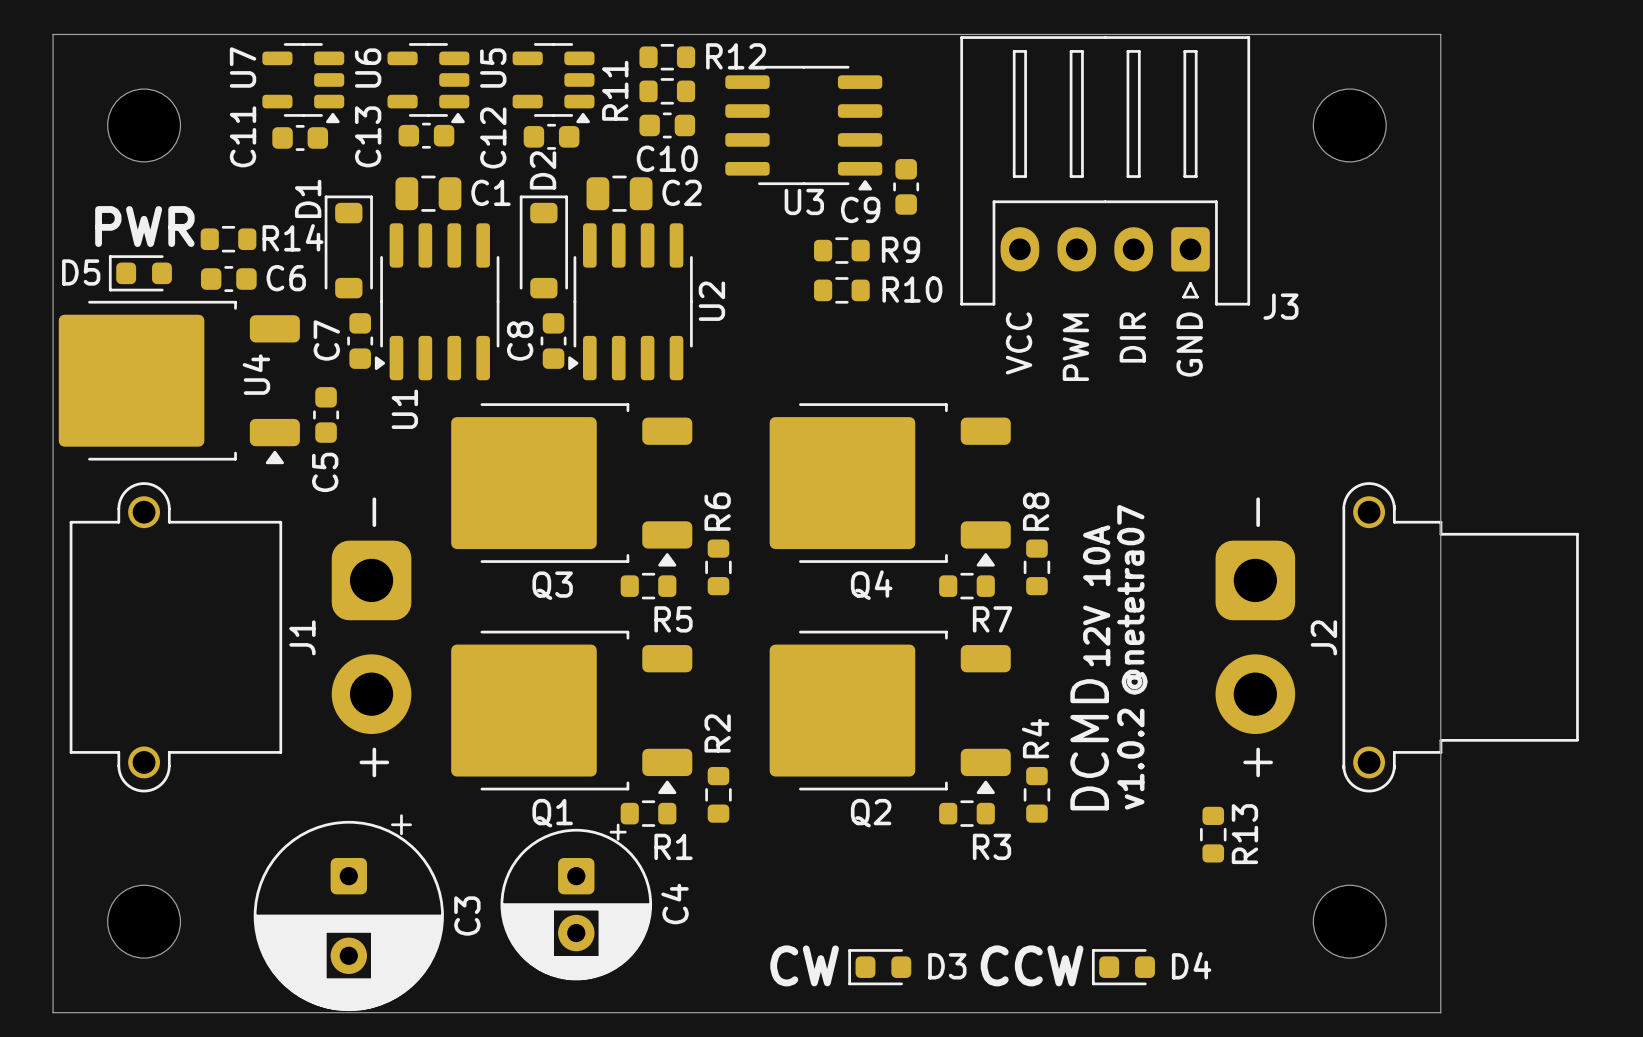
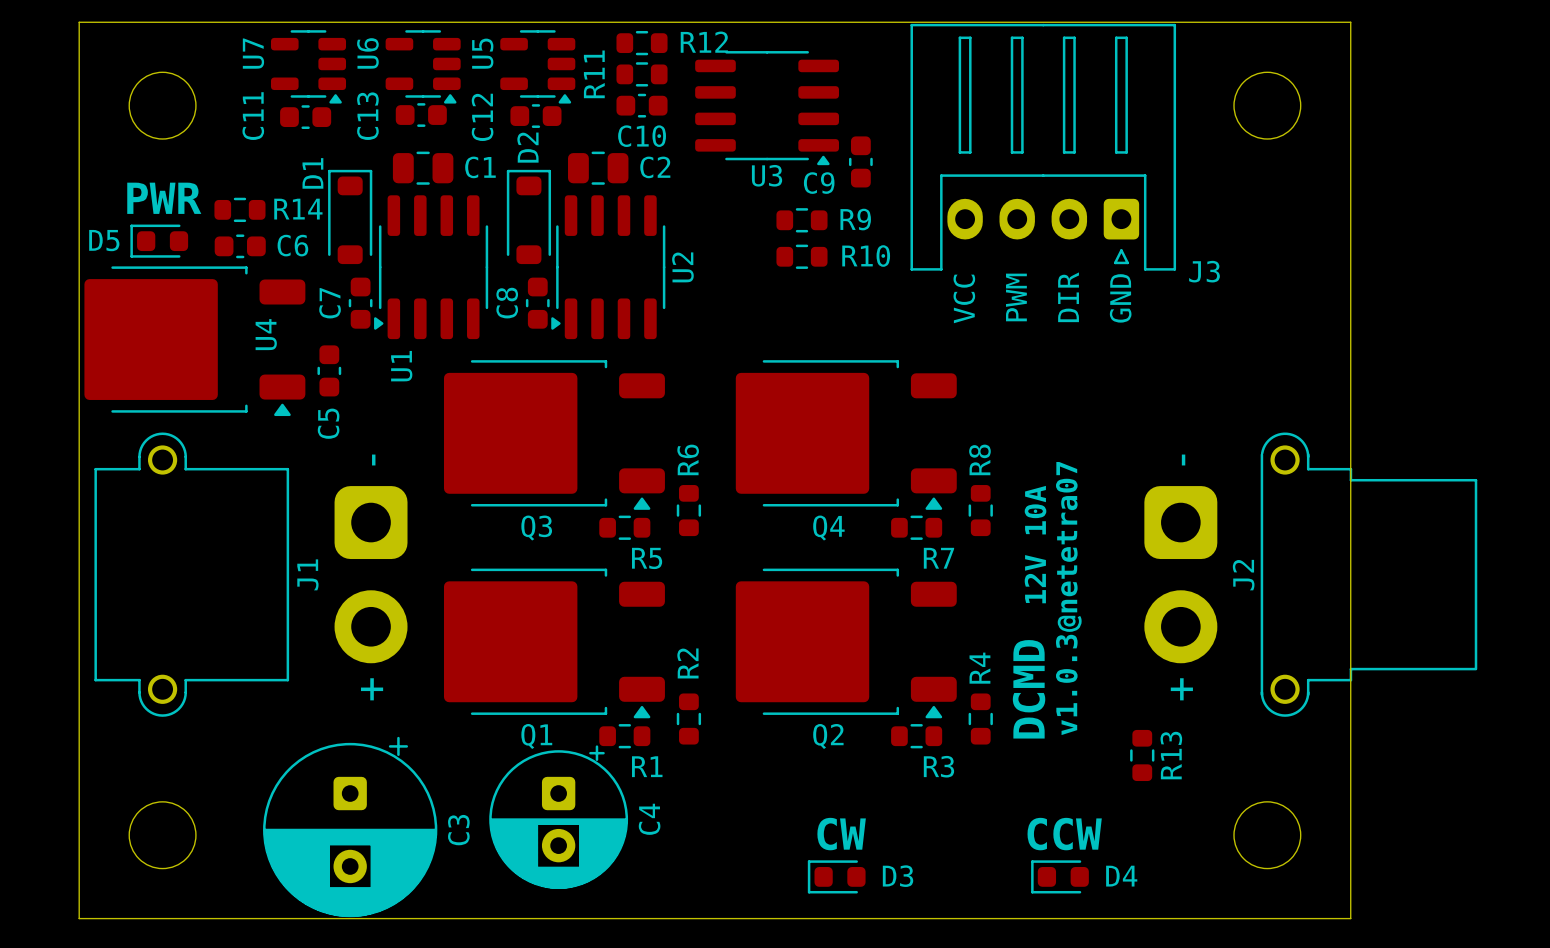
text: v1.0.2 (1130, 759) -> v1.0.3 (1066, 684)
text position: CW (804, 965) -> CW (841, 834)
text position: CCW (1032, 965) -> CCW (1064, 834)

